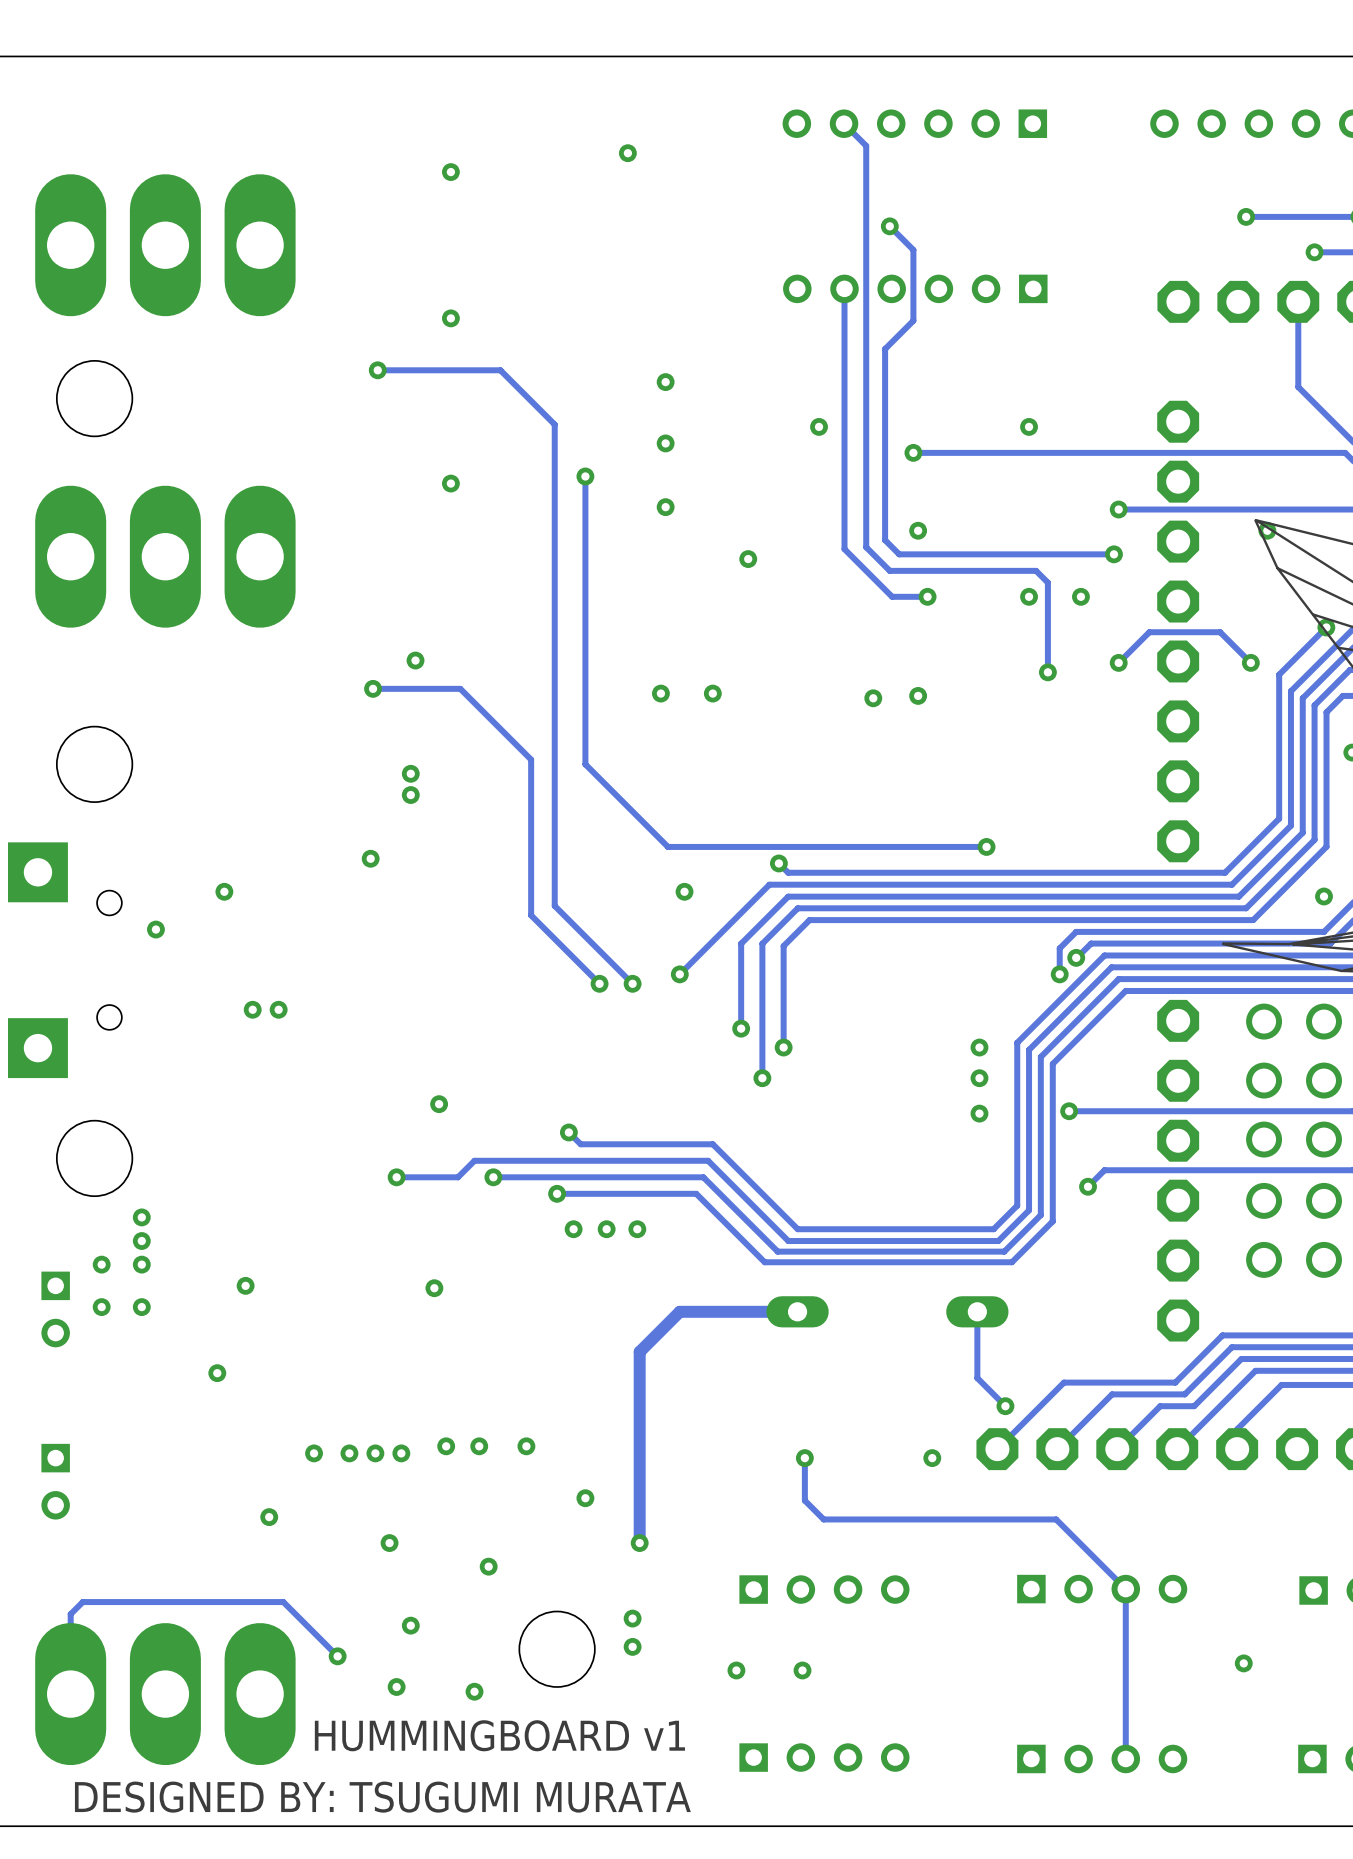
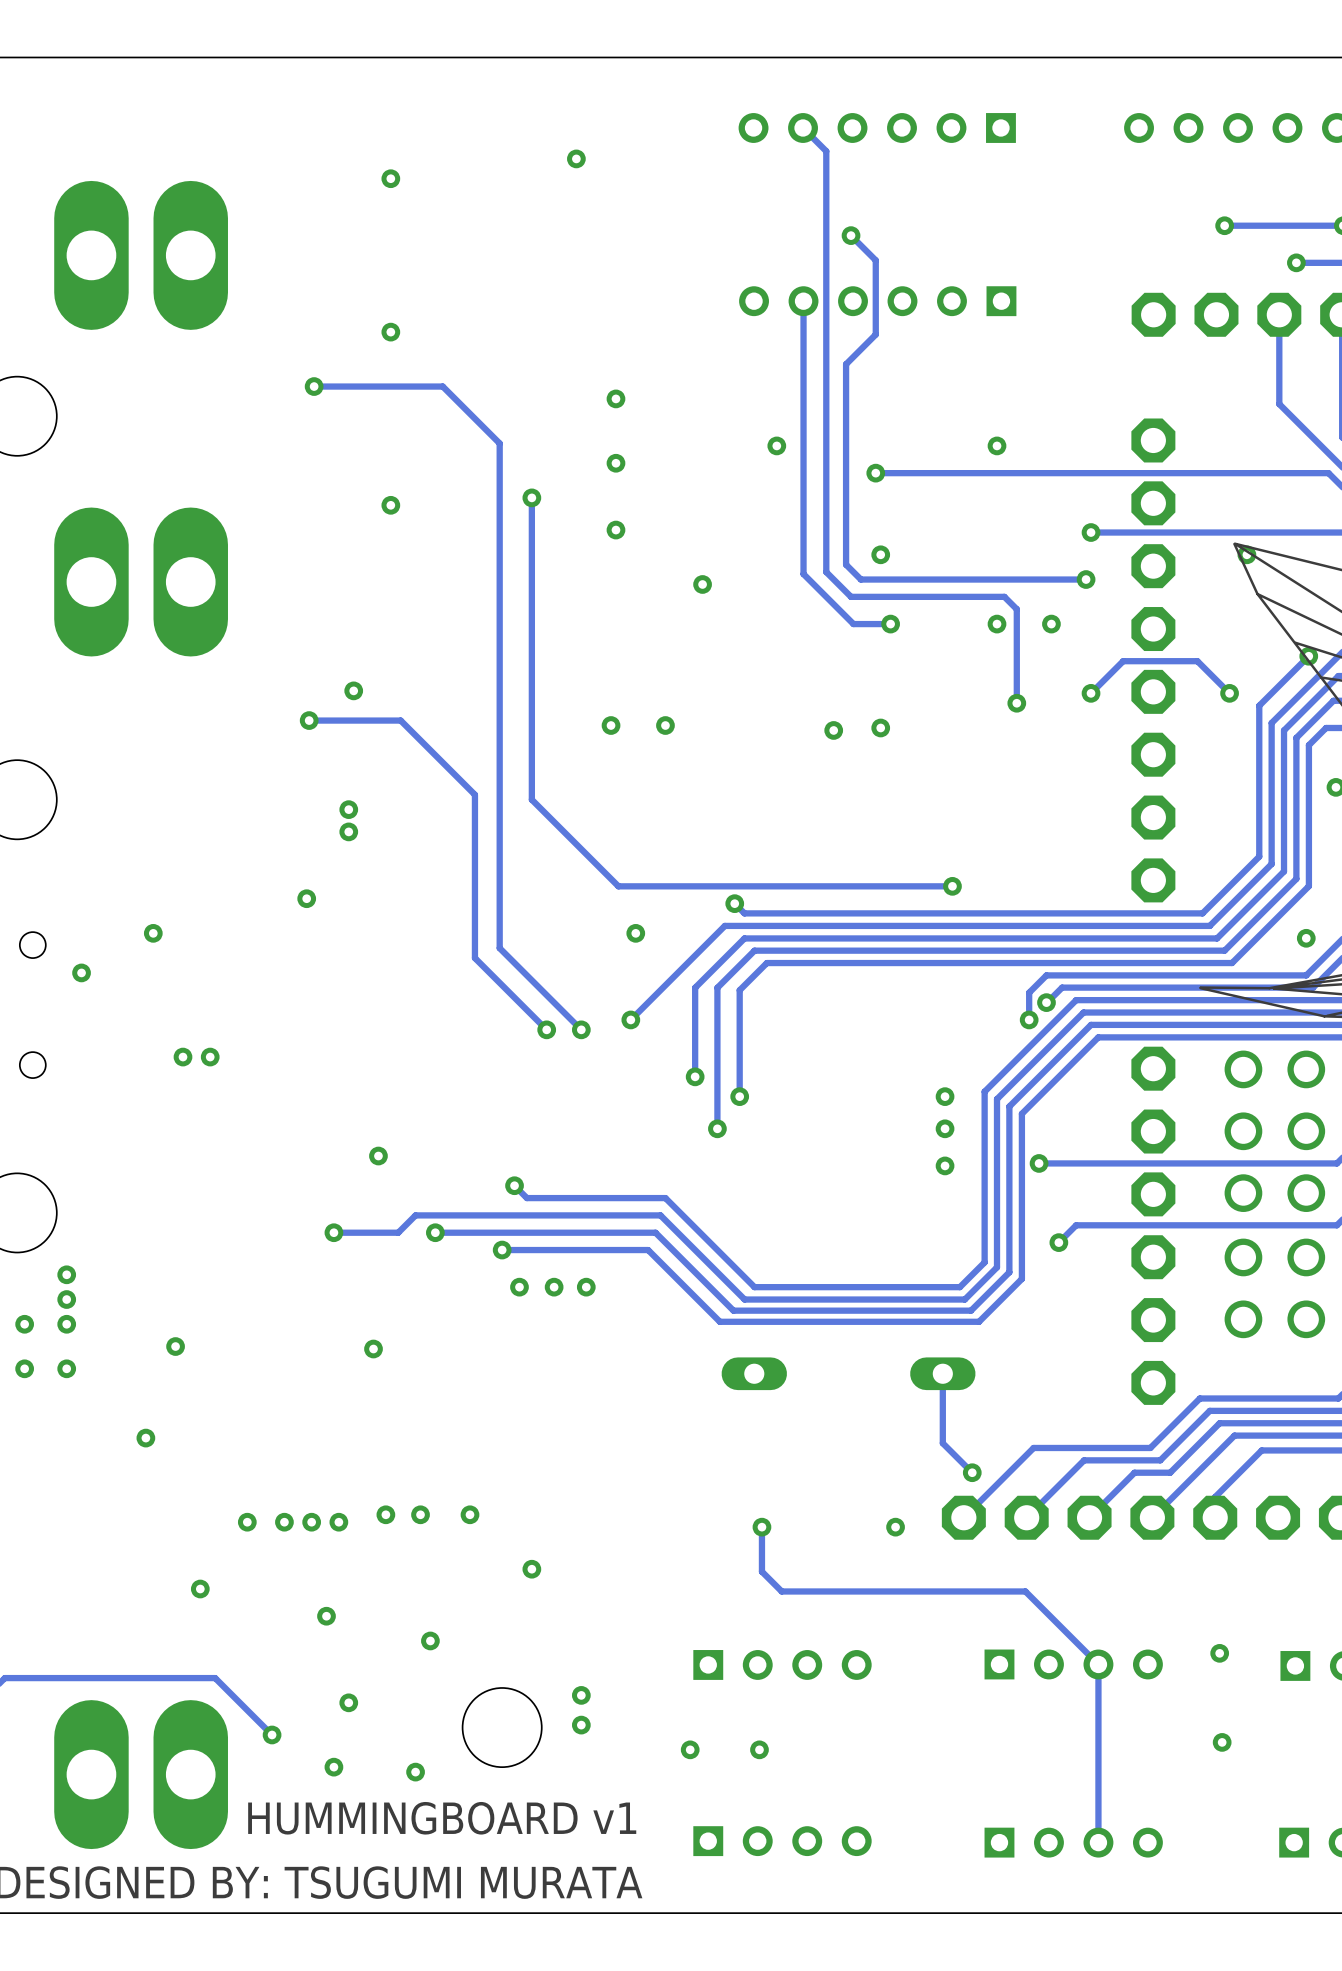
track: (797, 1311) (679, 1311) (639, 1351) (639, 1543) -> none
via: (639, 1543) -> none
via: none -> (1219, 1653)

